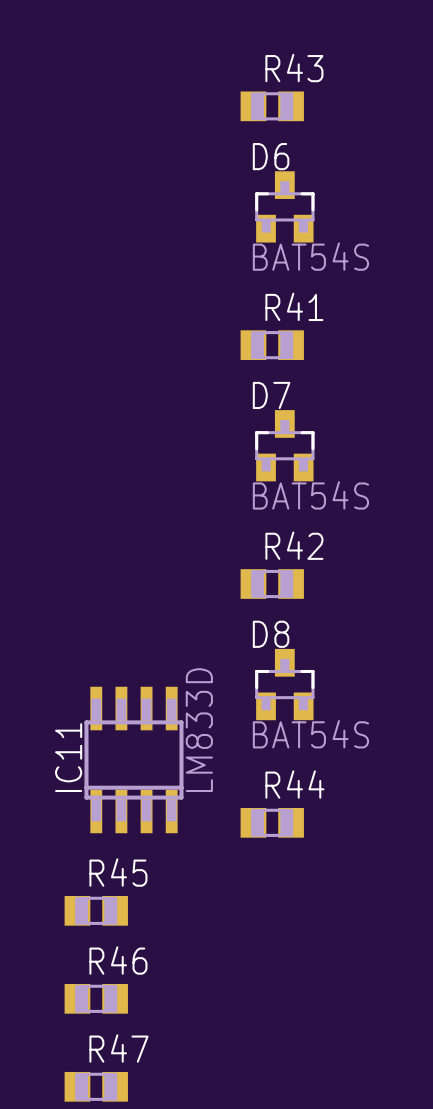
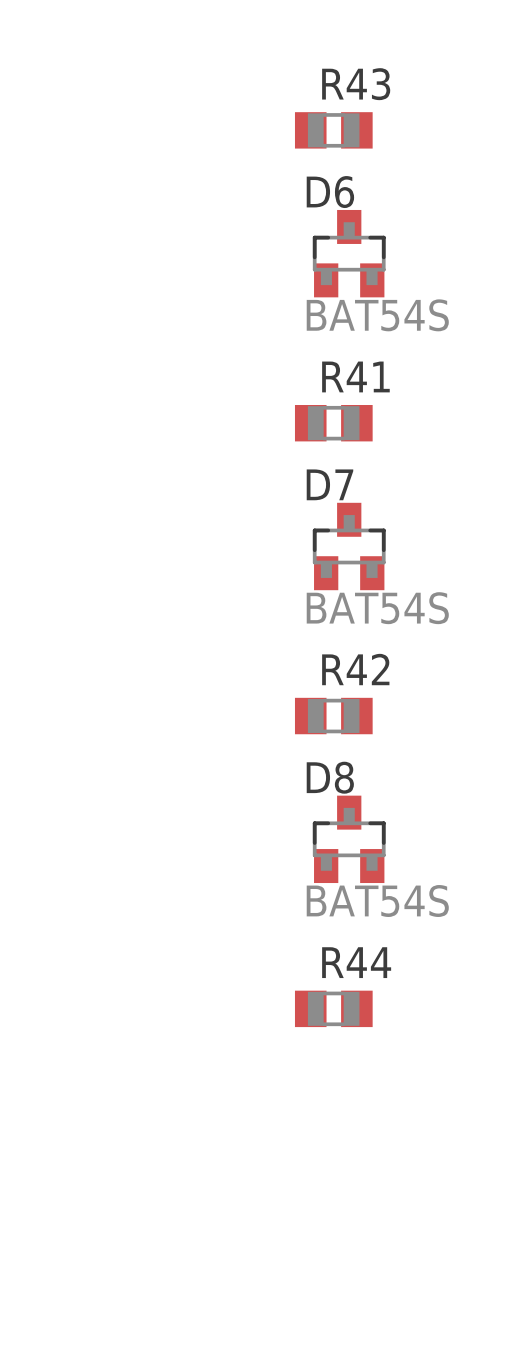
IC11: LM833D (133, 759) -> none
R45: (96, 910) -> none
R46: (96, 998) -> none
R47: (96, 1086) -> none

